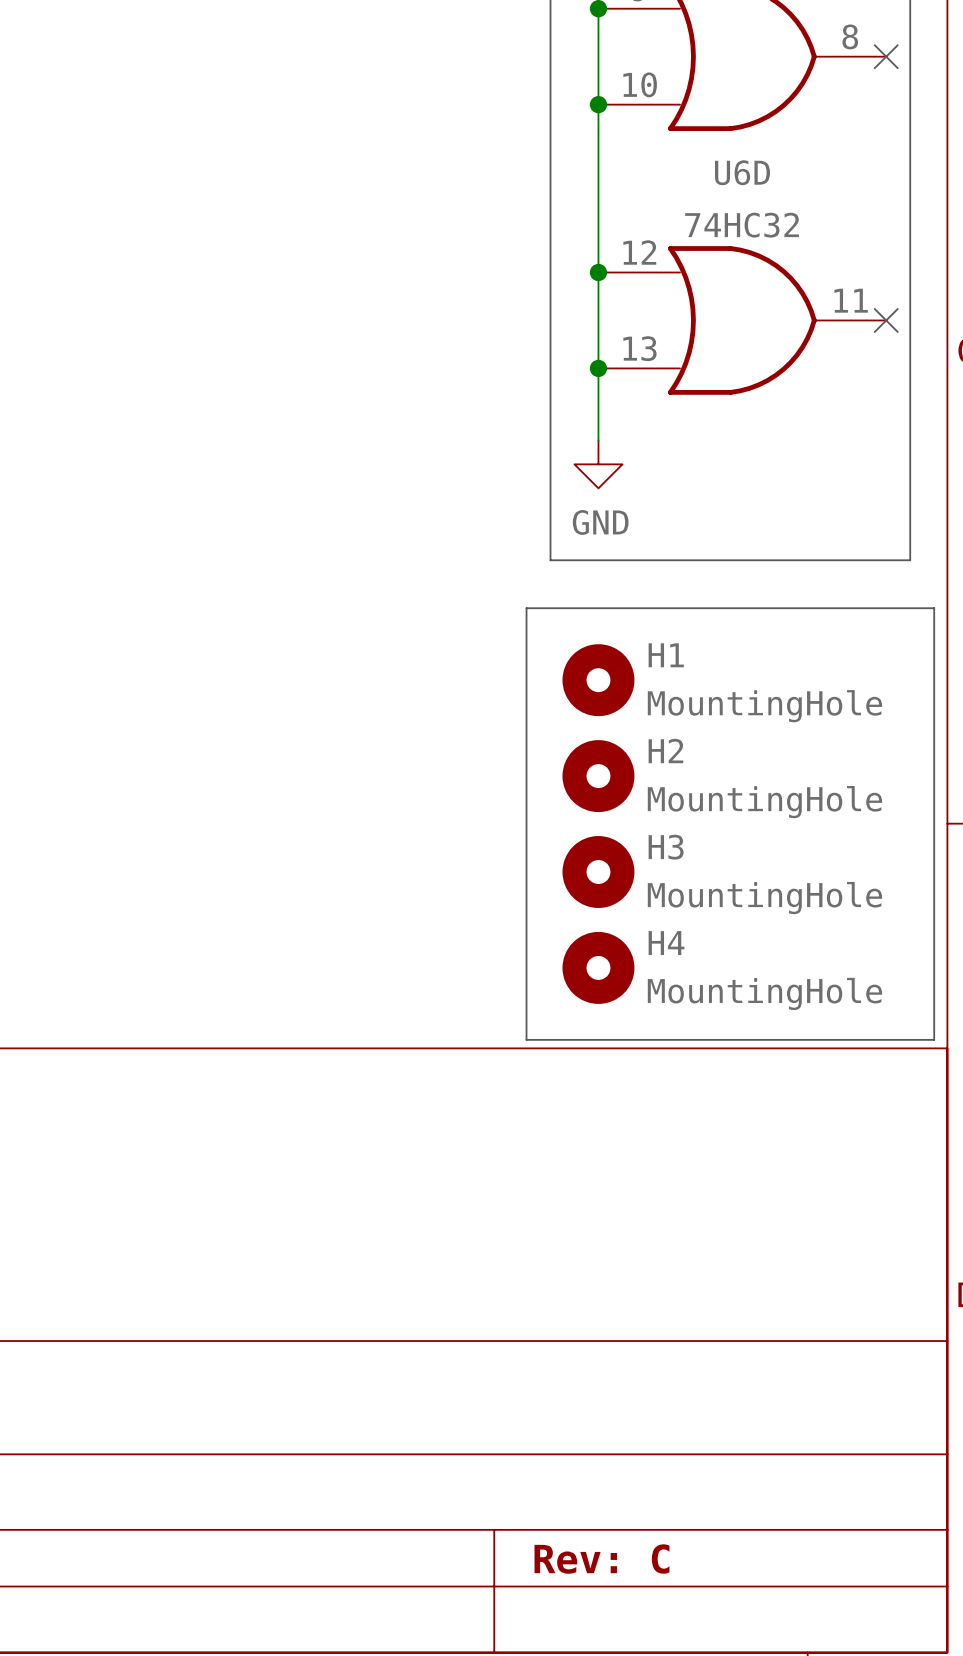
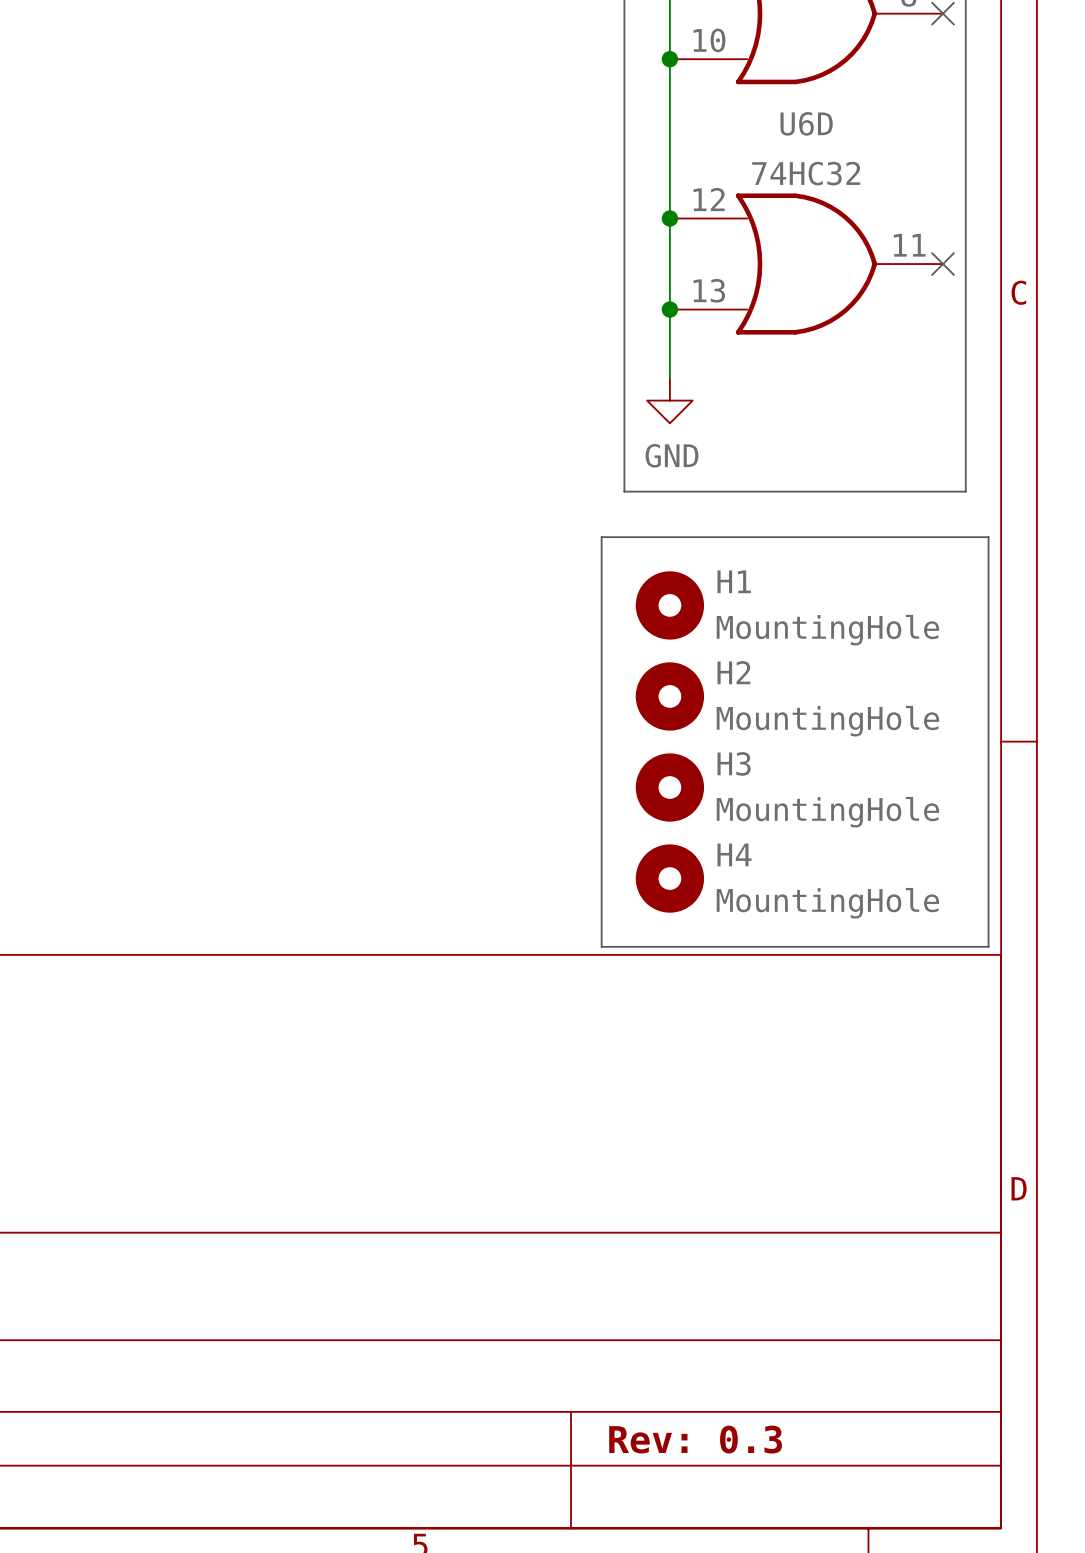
title block: Rev: C (601, 1559) -> Rev: 0.3 (695, 1439)

